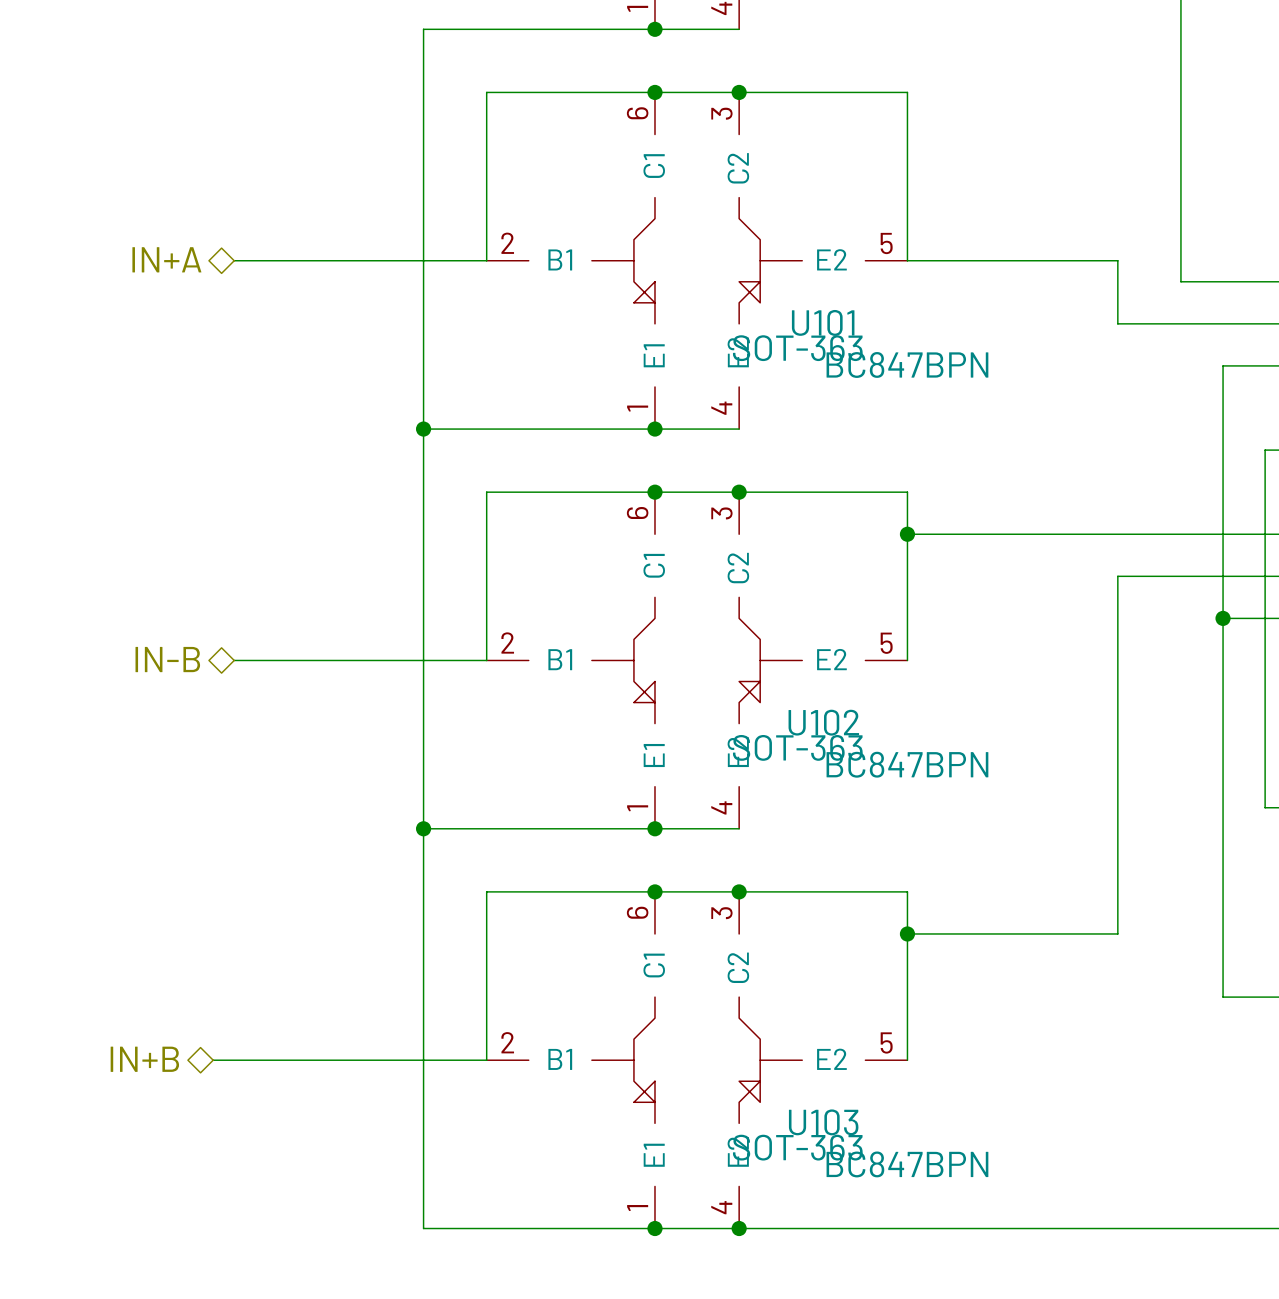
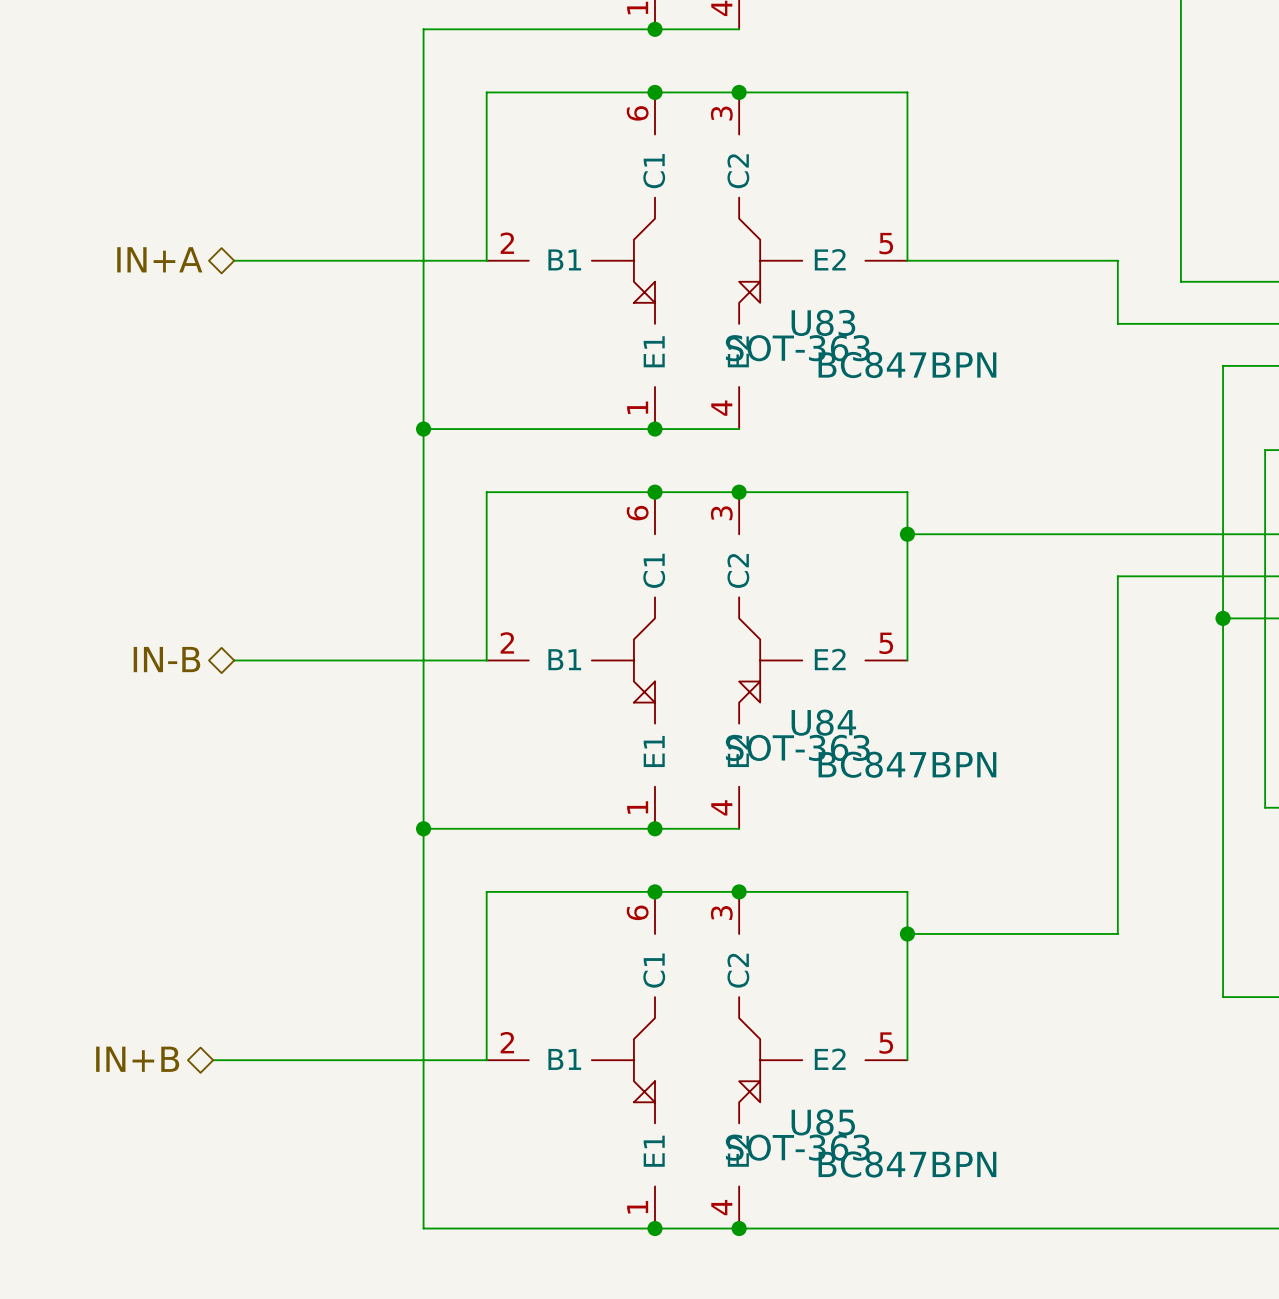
U101 name: U101 (823, 322) -> U83 (823, 322)
U102 name: U102 (823, 722) -> U84 (823, 722)
U103 name: U103 (823, 1122) -> U85 (823, 1122)

